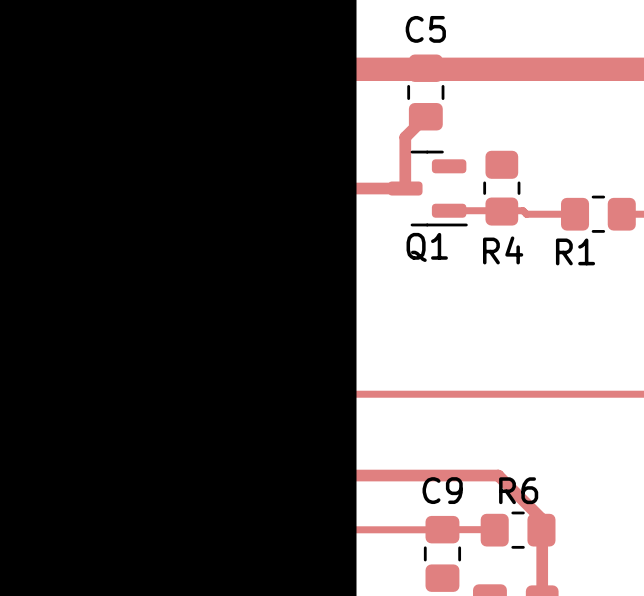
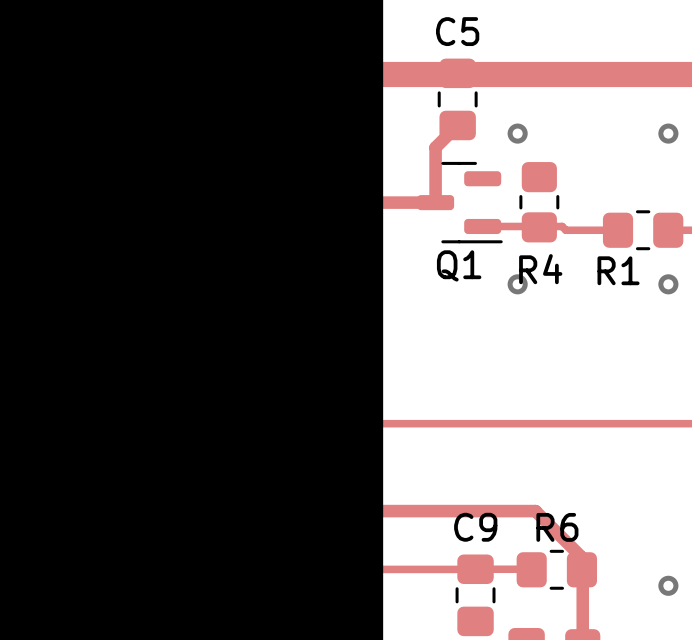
via: none -> (517, 133)
via: none -> (668, 133)
via: none -> (517, 284)
via: none -> (668, 284)
via: none -> (668, 585)

